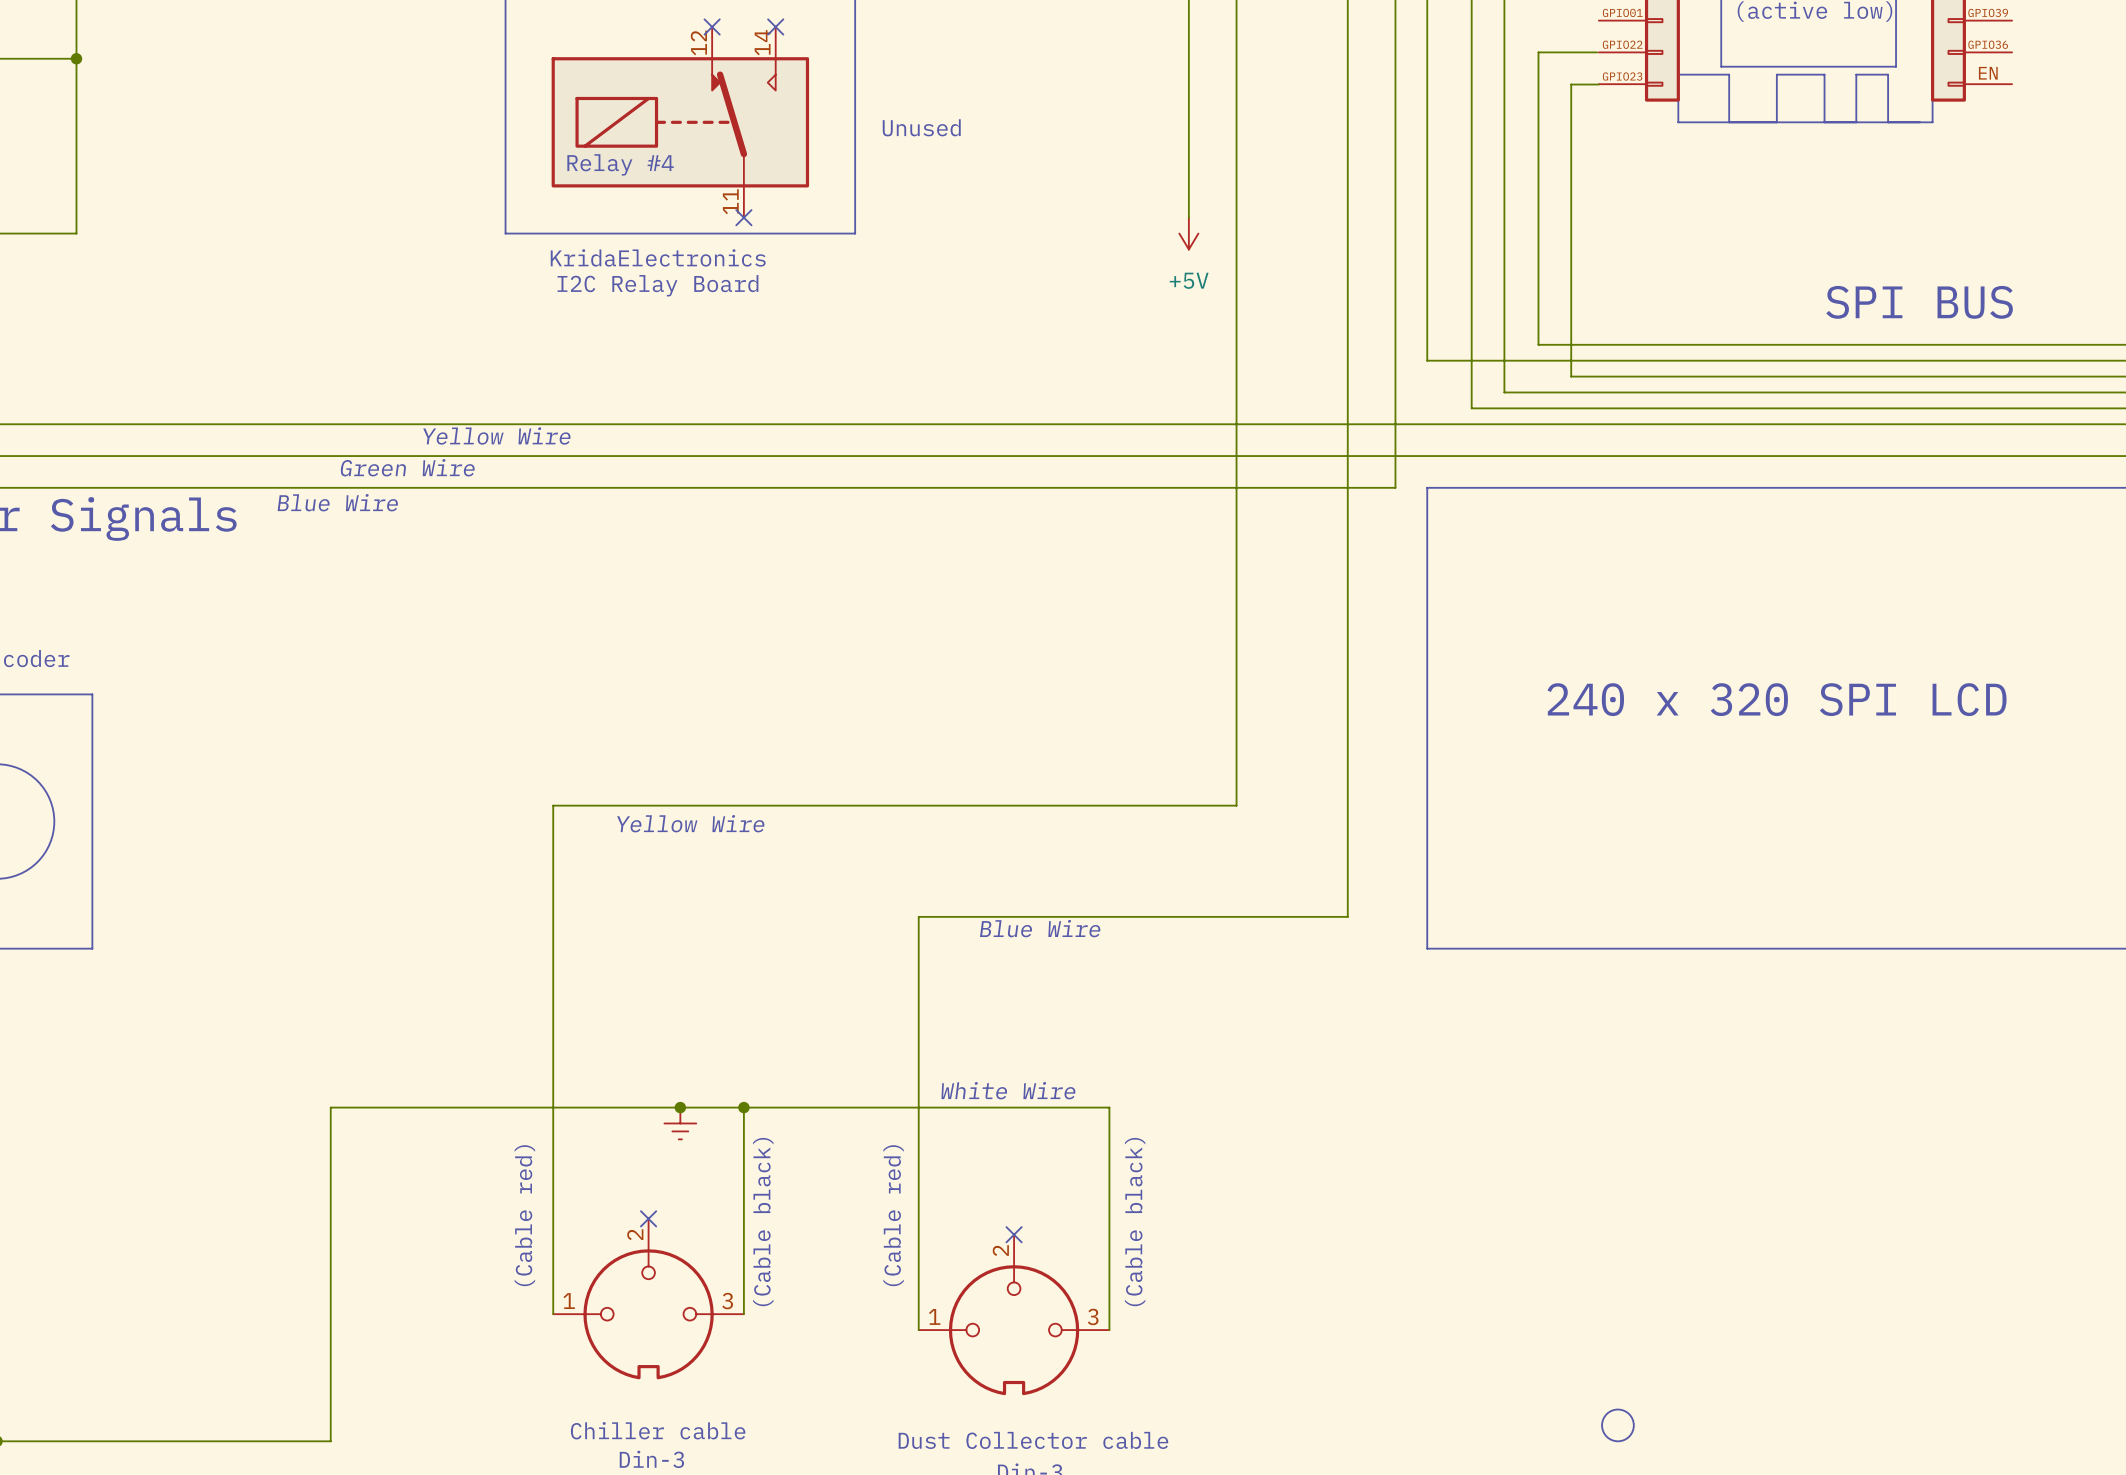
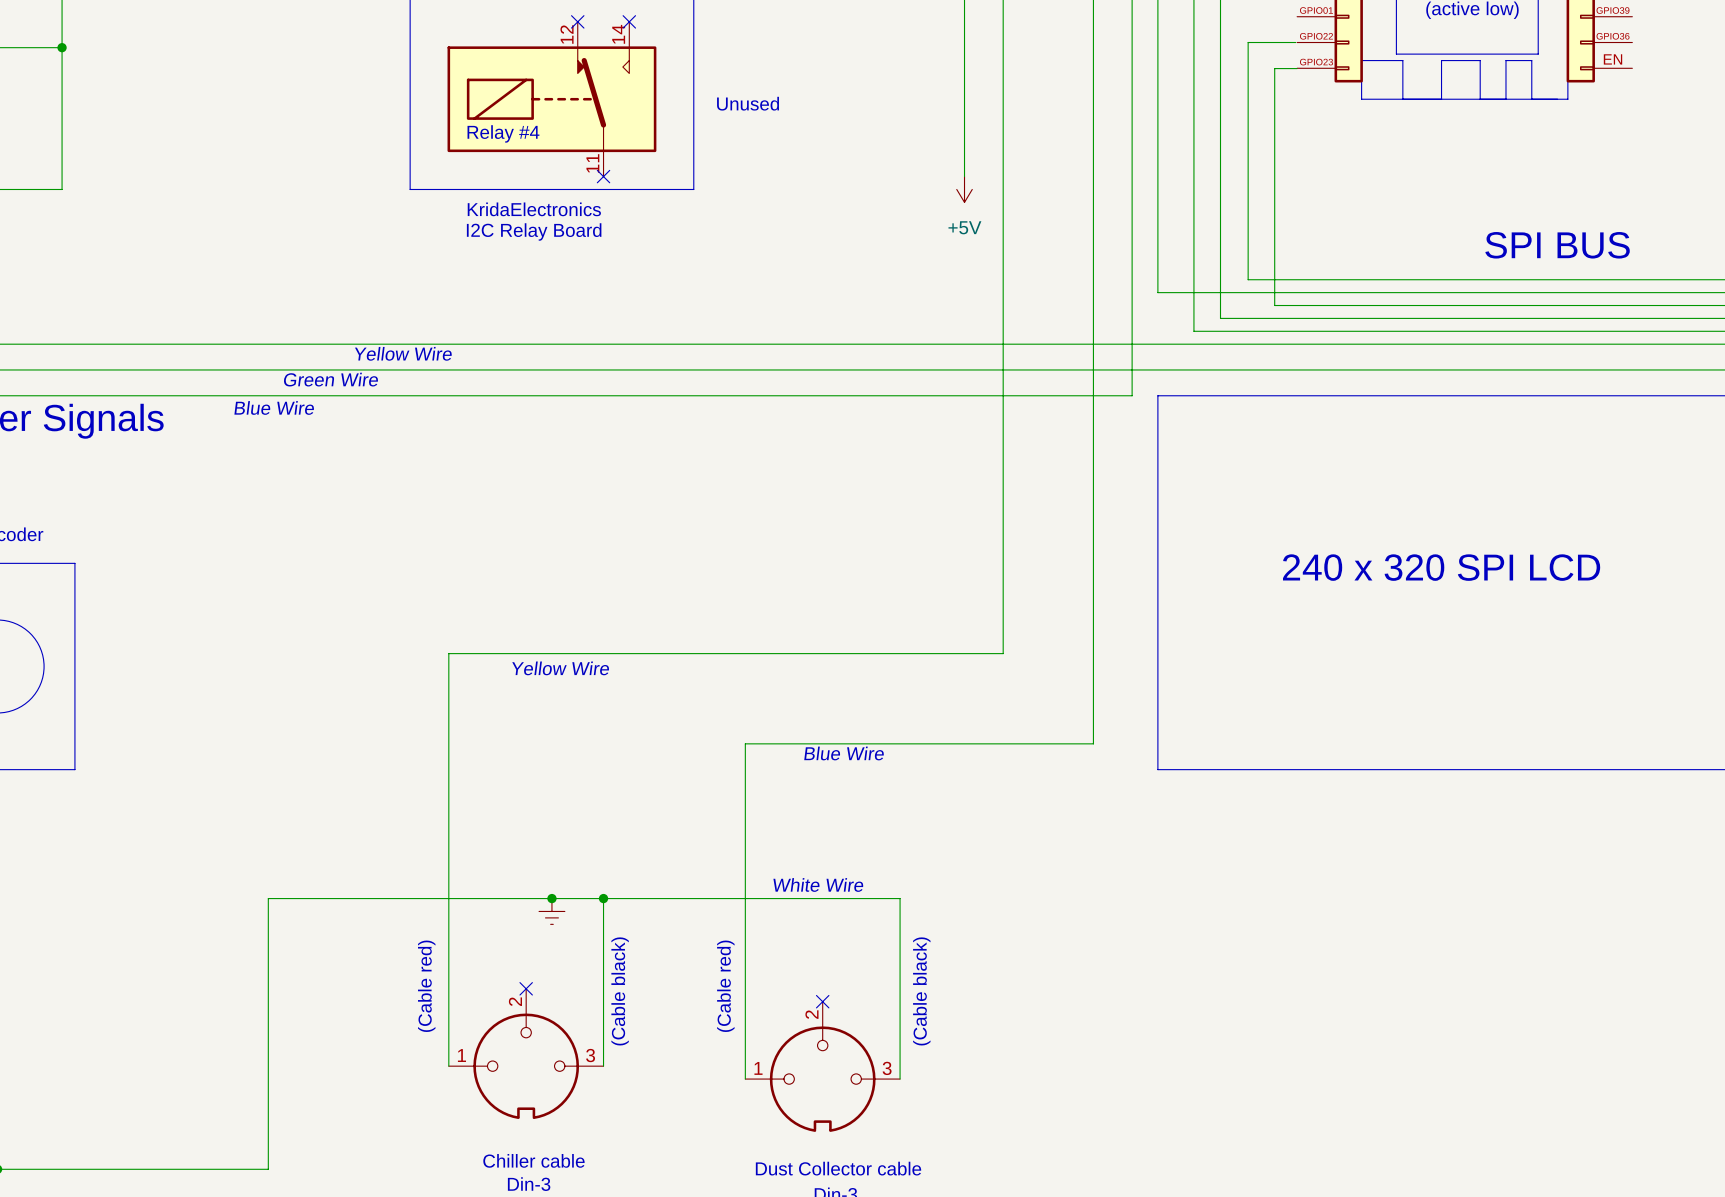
drawing: [1602, 1409, 1634, 1442] -> none

